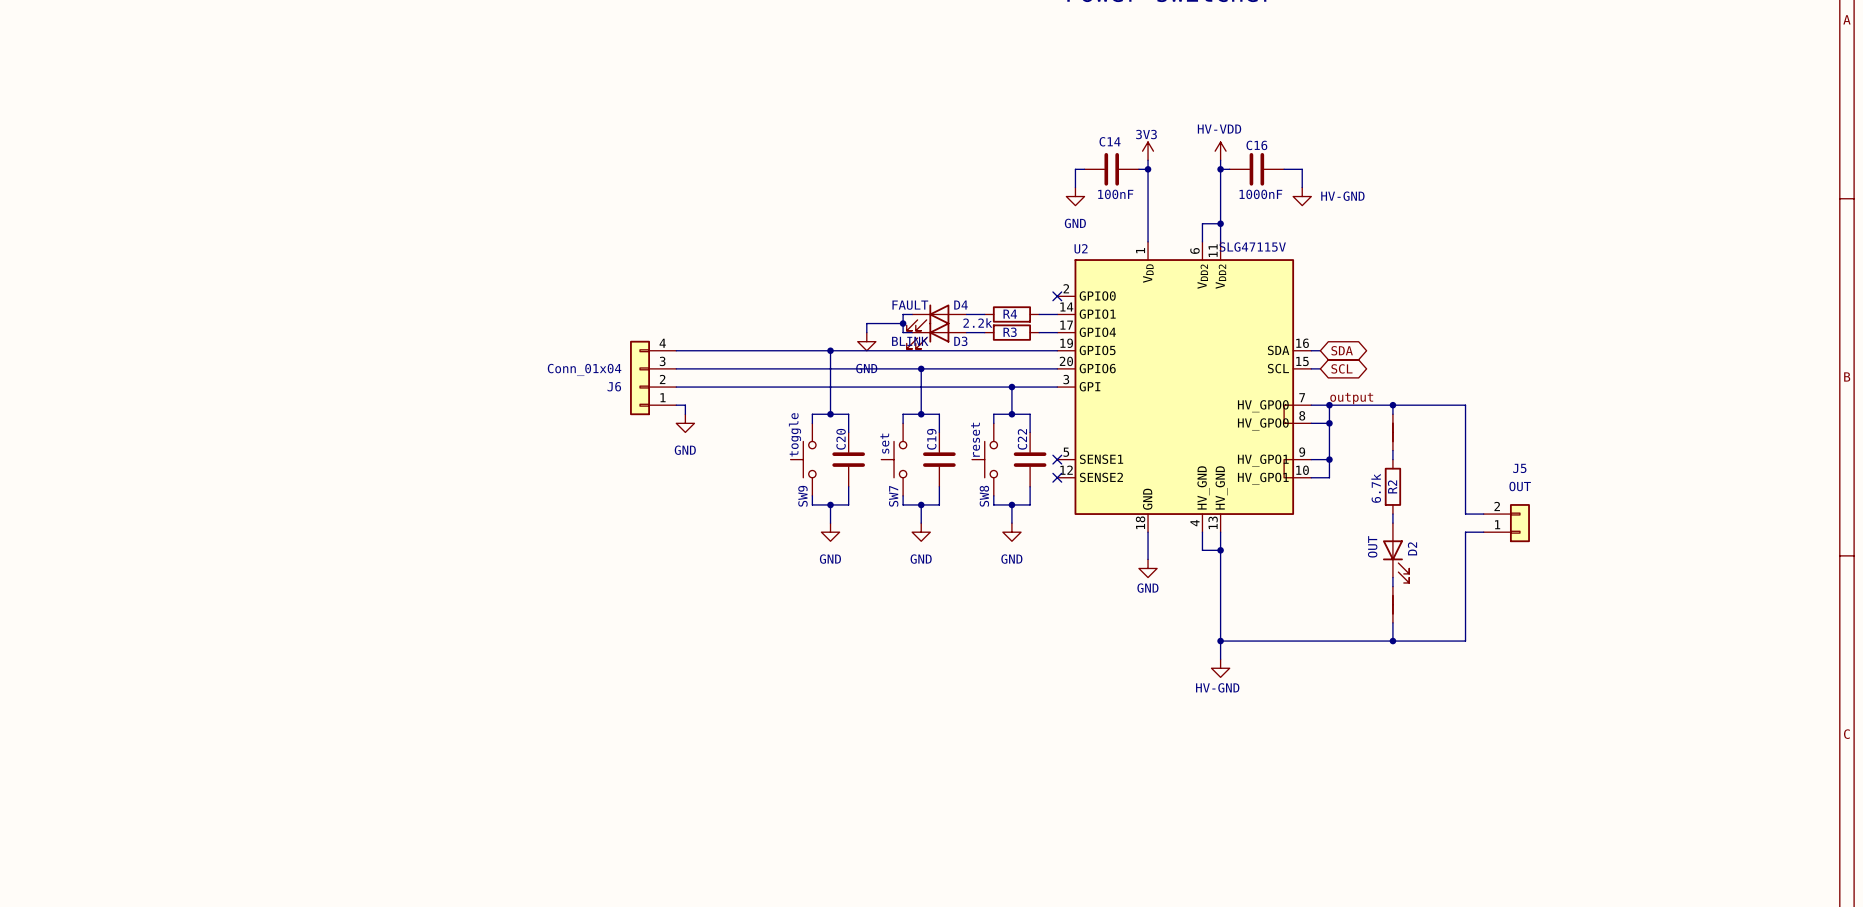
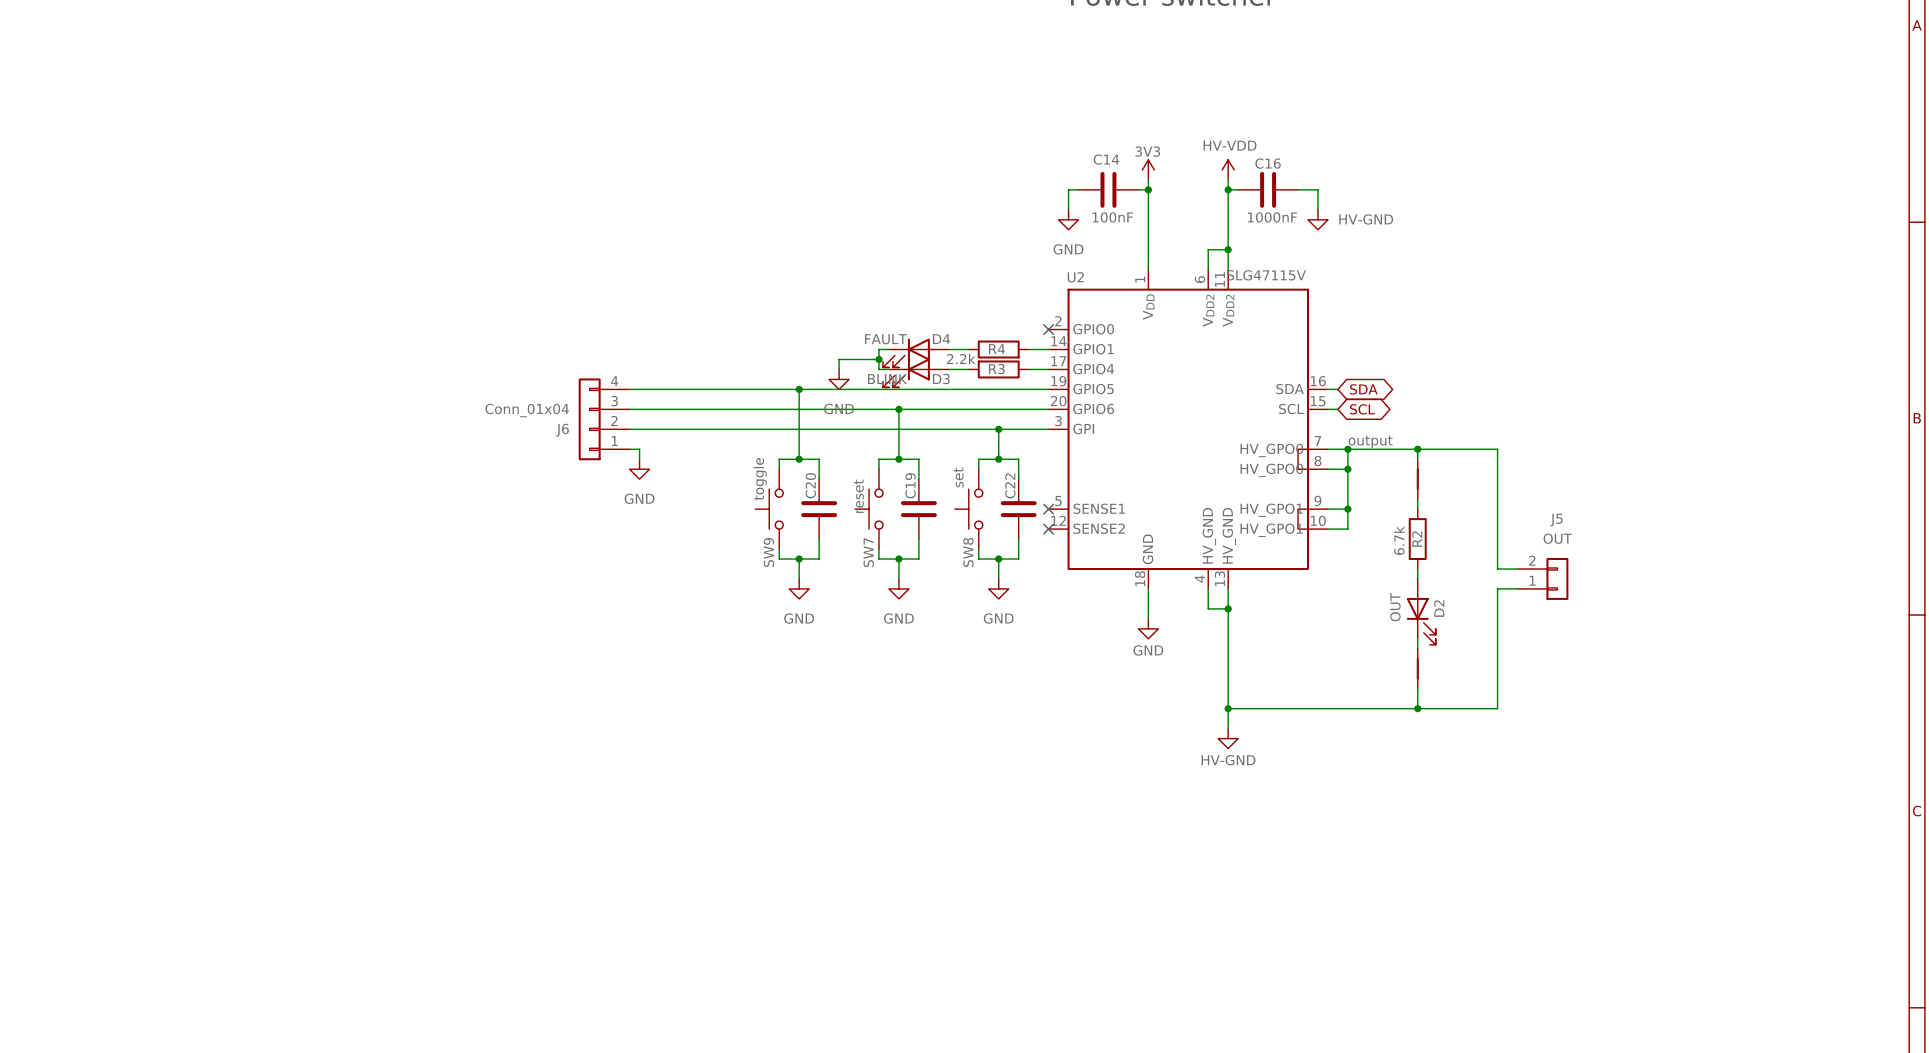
SW8 value: reset (975, 439) -> set (958, 477)
SW7 value: set (884, 443) -> reset (858, 496)

